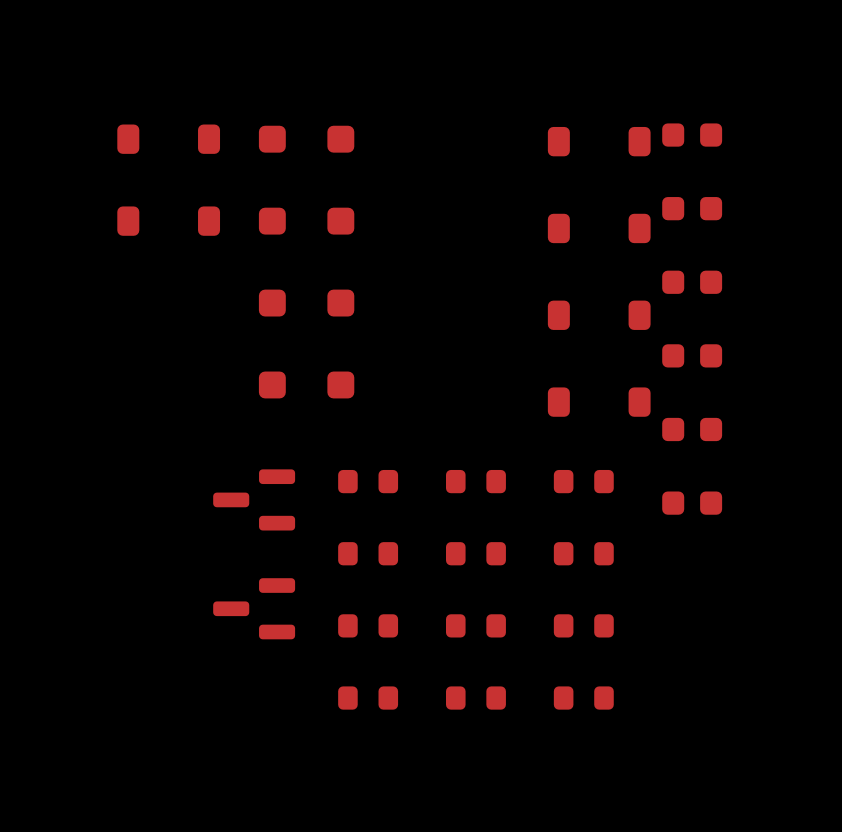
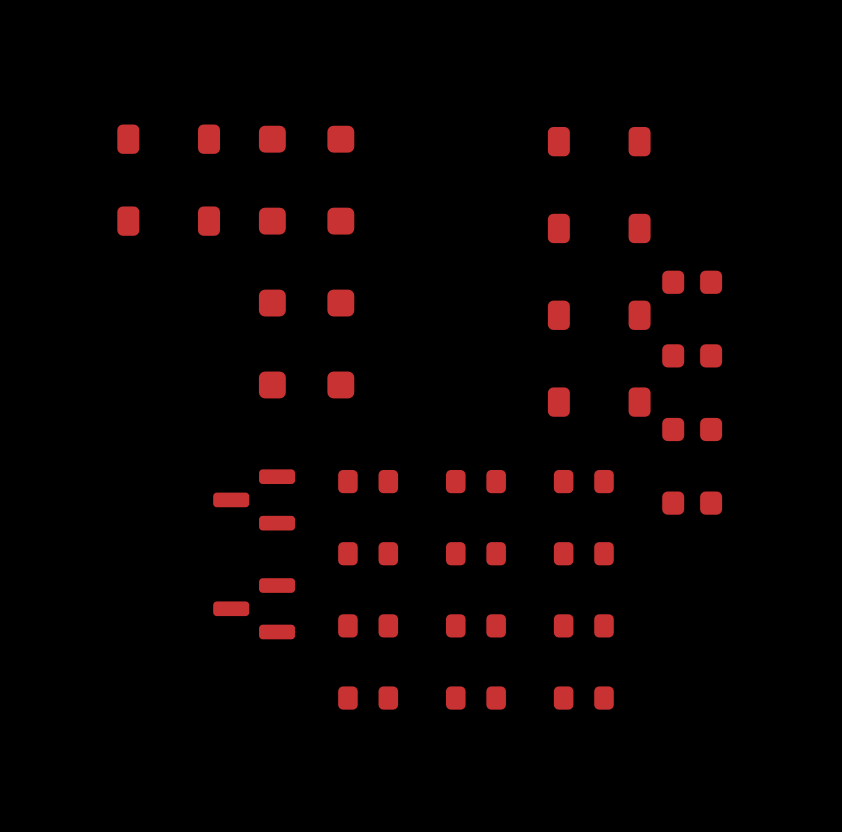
part: (692, 135) -> none
part: (692, 208) -> none

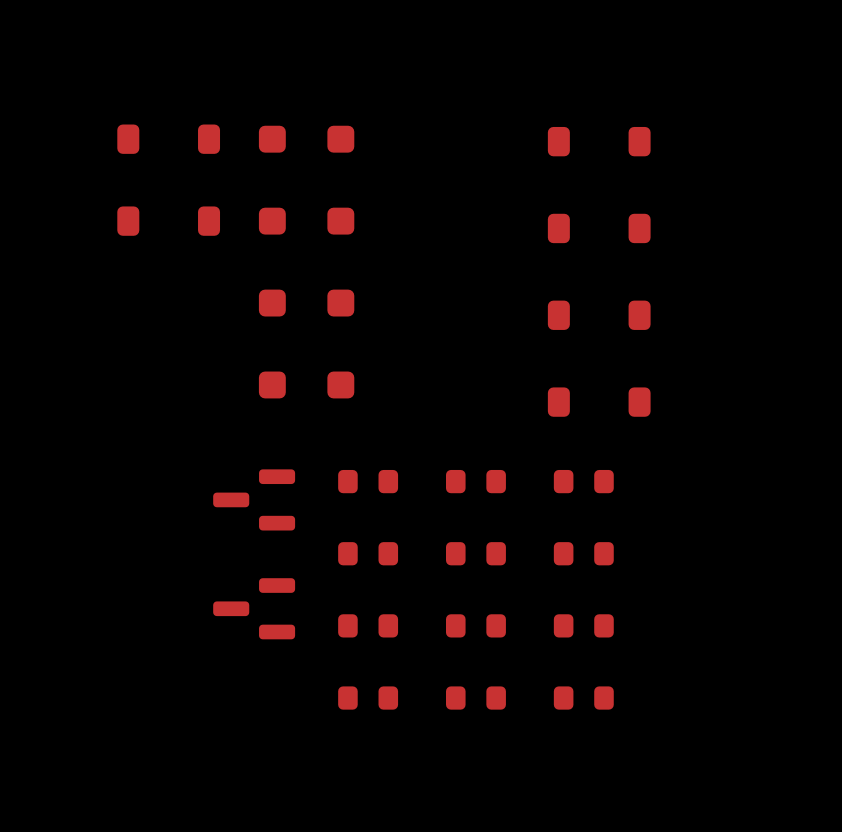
part: (692, 282) -> none
part: (692, 355) -> none
part: (692, 429) -> none
part: (692, 503) -> none

